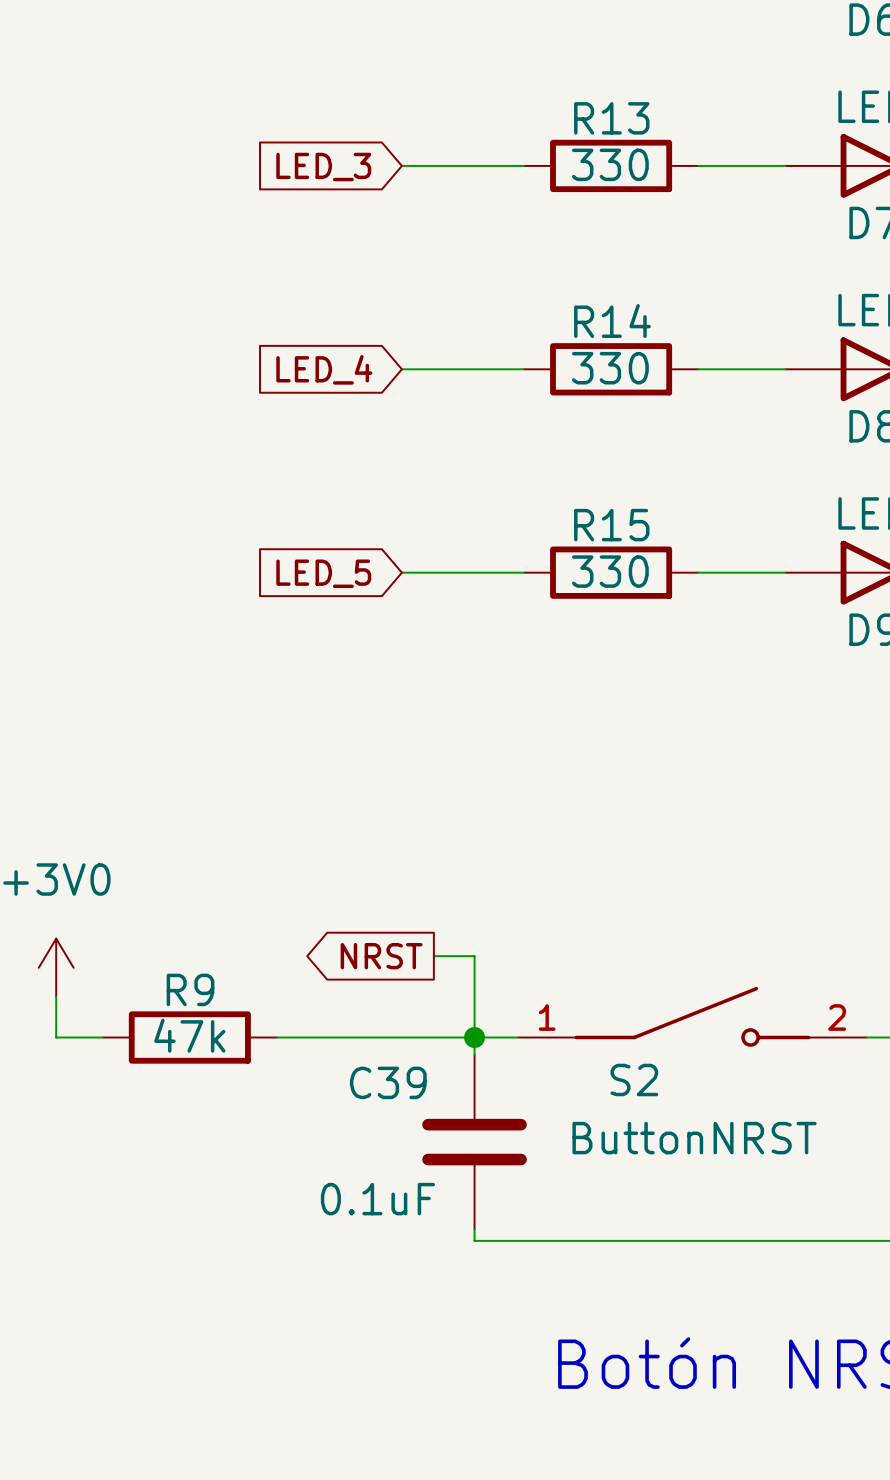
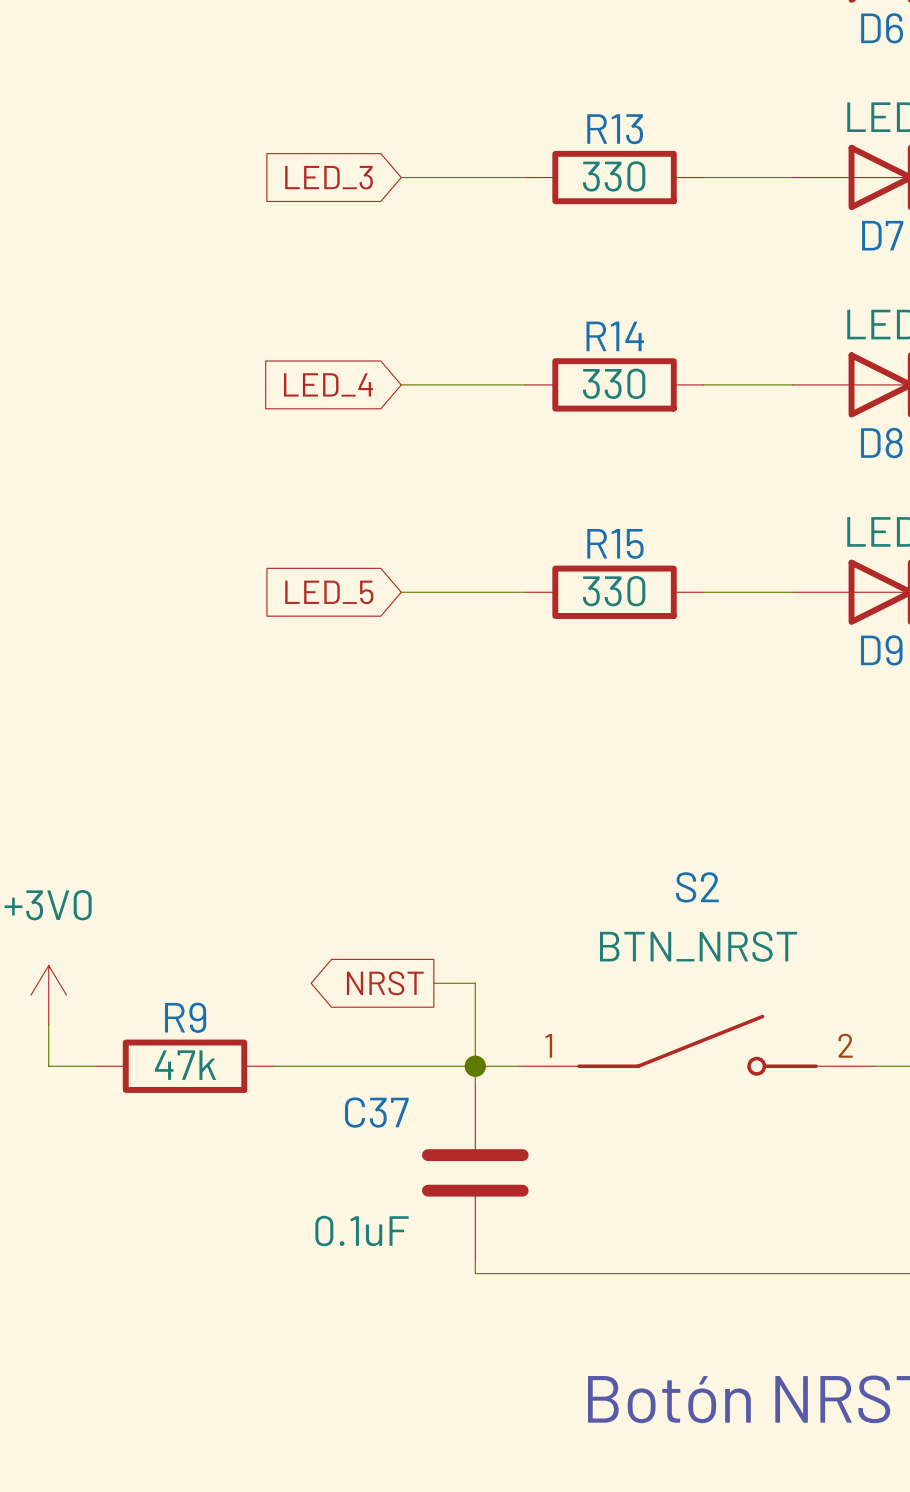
S2 name position: S2 (634, 1079) -> S2 (697, 887)
C39 name: C39 (388, 1082) -> C37 (376, 1112)
S2 value: ButtonNRST (694, 1138) -> BTN_NRST (698, 946)

